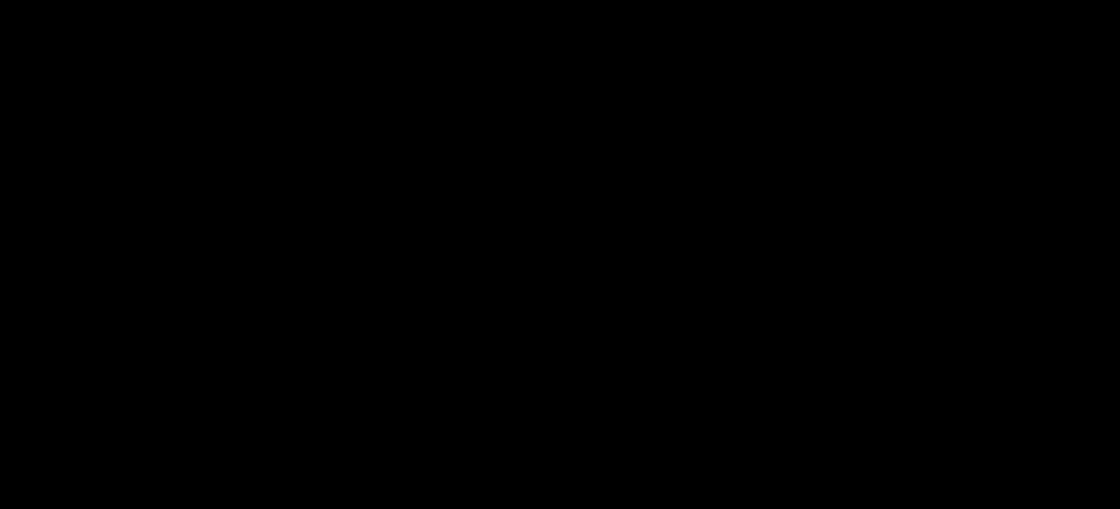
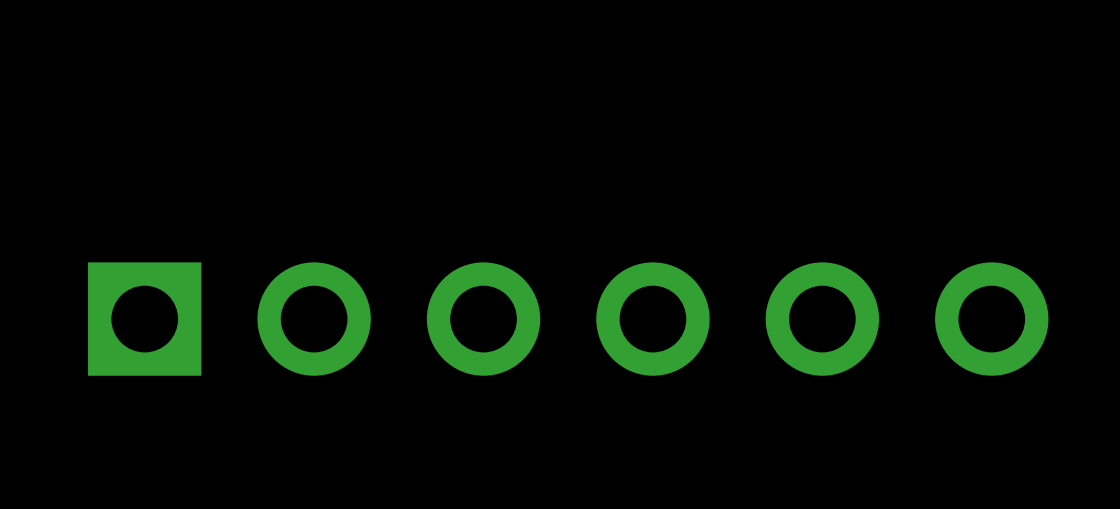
part: none -> (568, 319)

